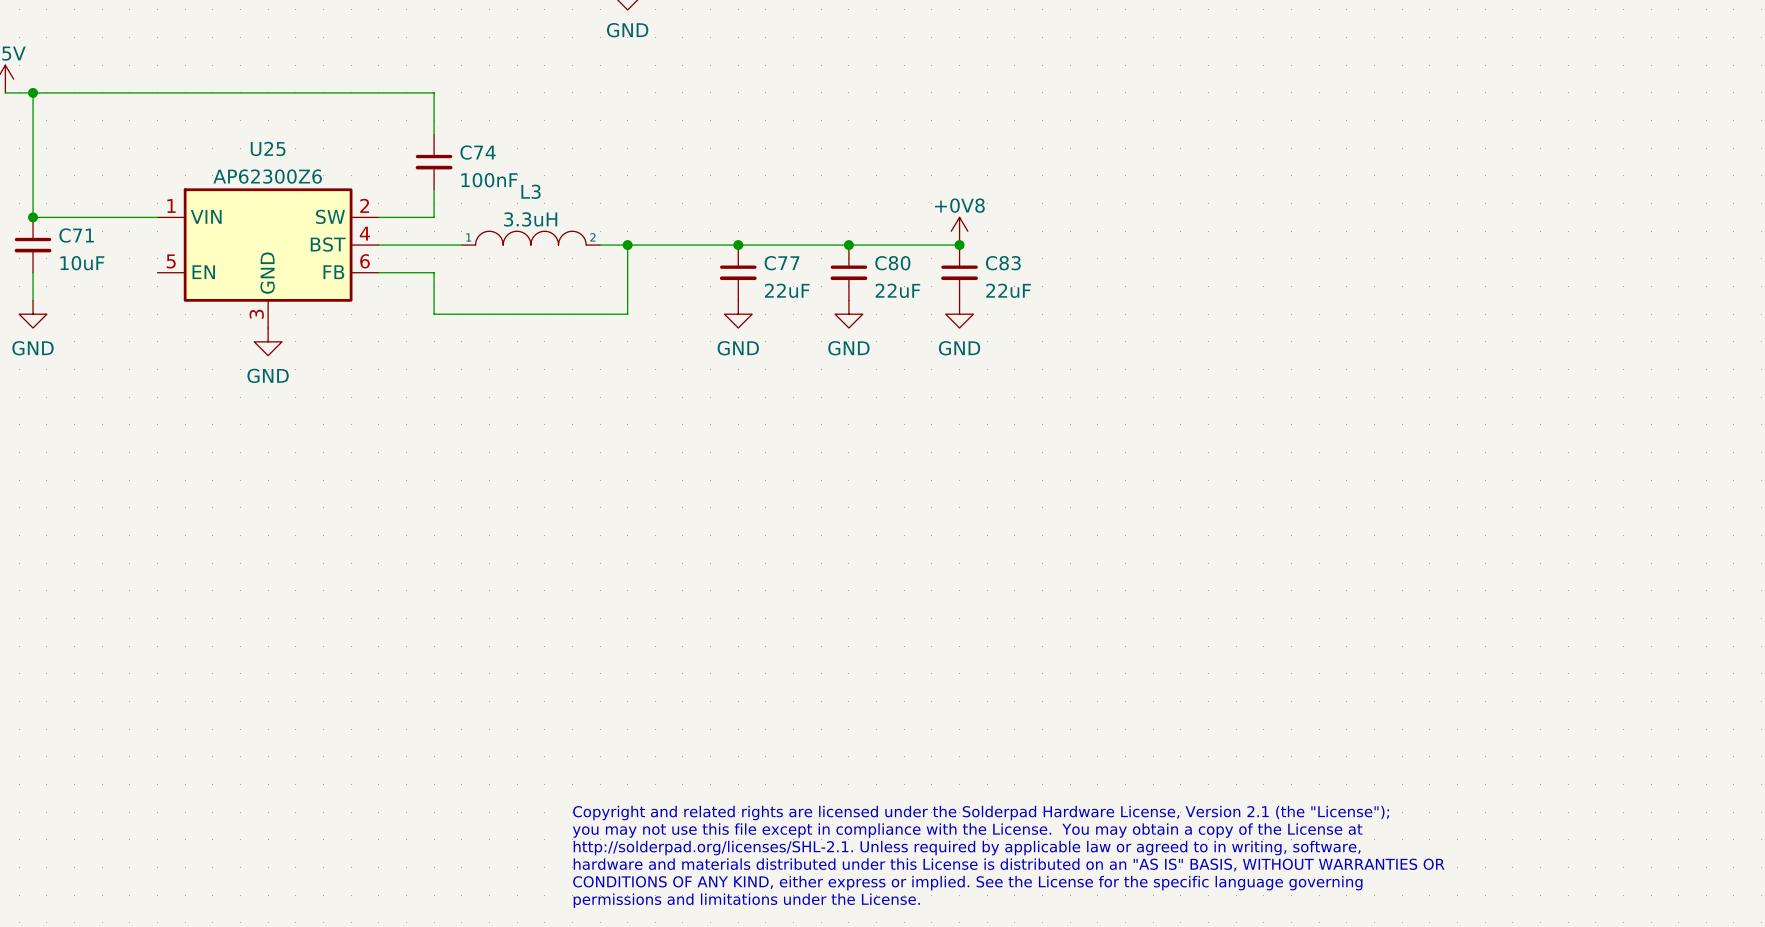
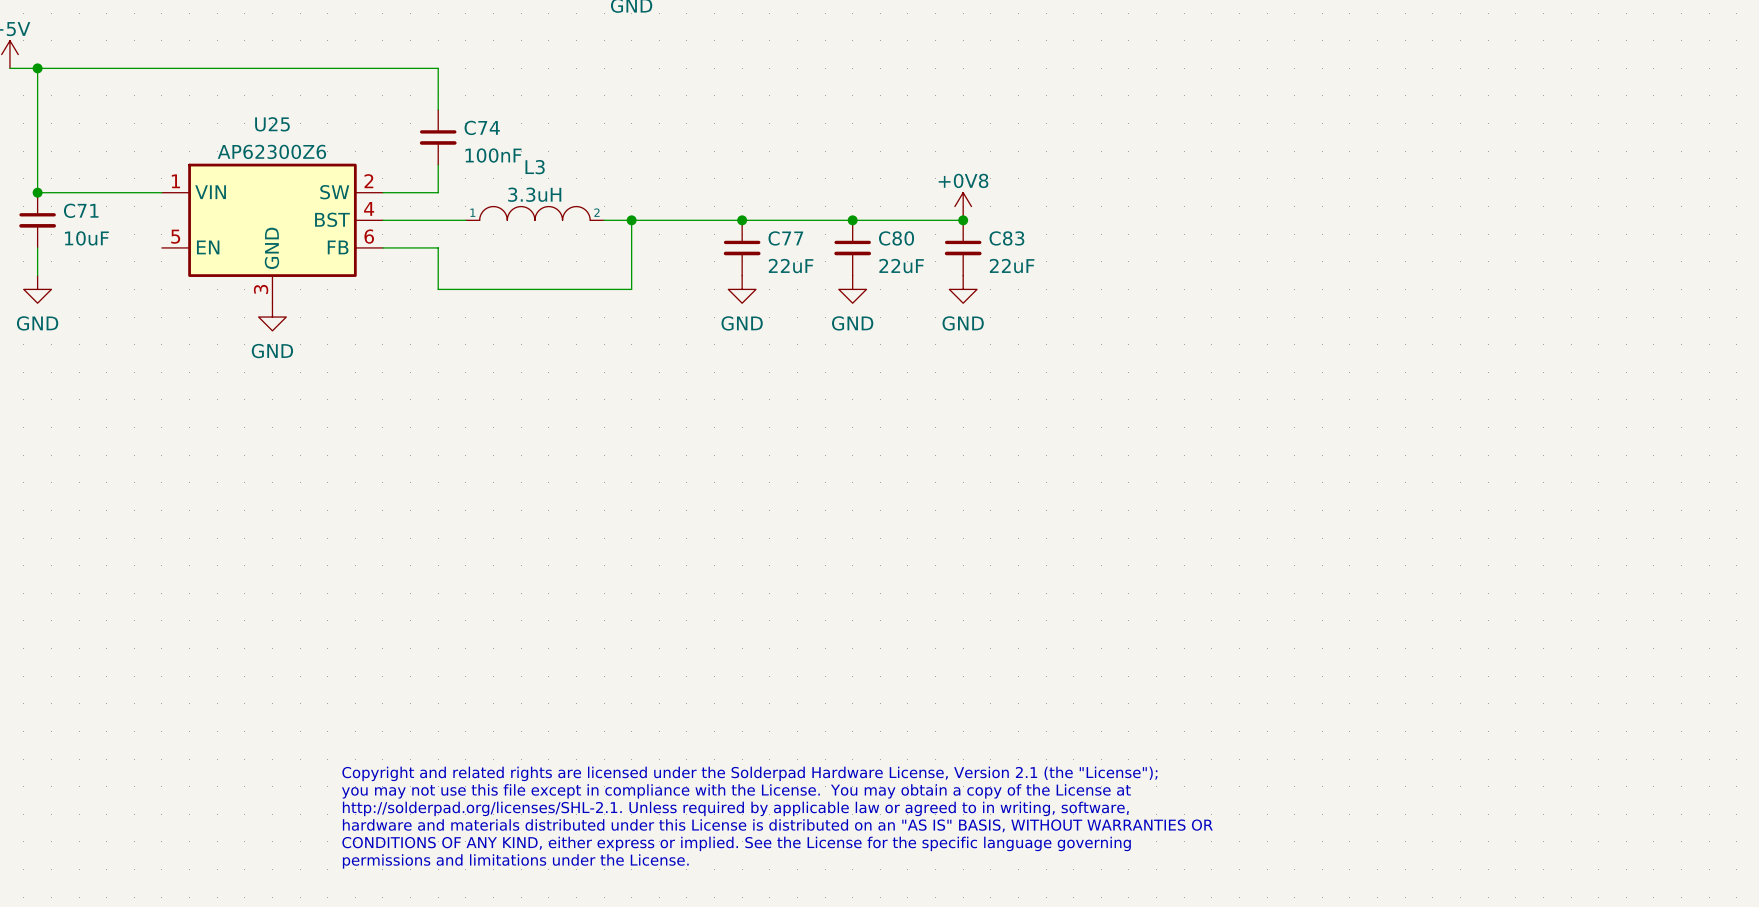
text position: Copyright and related rights are licensed under the Solderpad Hardware License, Version 2.1 (the "License"); (981, 813) -> Copyright and related rights are licensed under the Solderpad Hardware License, Version 2.1 (the "License"); (749, 773)
text position: you may not use this file except in compliance with the License. You may obtain a copy of the License at (967, 830) -> you may not use this file except in compliance with the License. You may obtain a copy of the License at (736, 791)
text position: http://solderpad.org/licenses/SHL-2.1. Unless required by applicable law or agreed to in writing, software, (967, 848) -> http://solderpad.org/licenses/SHL-2.1. Unless required by applicable law or agreed to in writing, software, (735, 808)
text position: hardware and materials distributed under this License is distributed on an "AS IS" BASIS, WITHOUT WARRANTIES OR (1009, 864) -> hardware and materials distributed under this License is distributed on an "AS IS" BASIS, WITHOUT WARRANTIES OR (777, 825)
text position: CONDITIONS OF ANY KIND, either express or implied. See the License for the specific language governing (967, 883) -> CONDITIONS OF ANY KIND, either express or implied. See the License for the specific language governing (736, 843)
text position: permissions and limitations under the License. (746, 900) -> permissions and limitations under the License. (515, 861)

